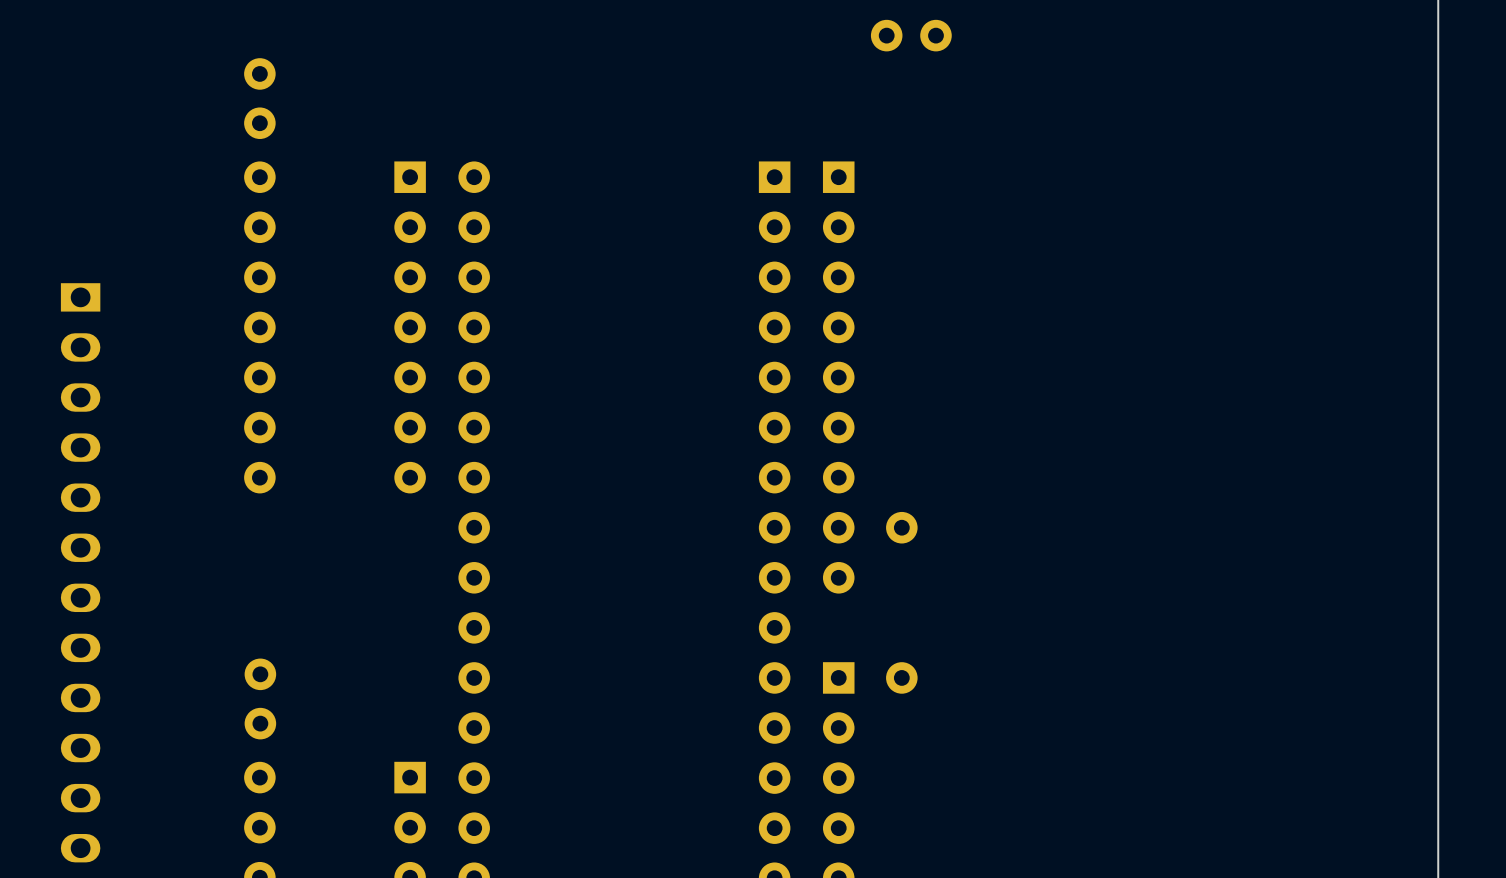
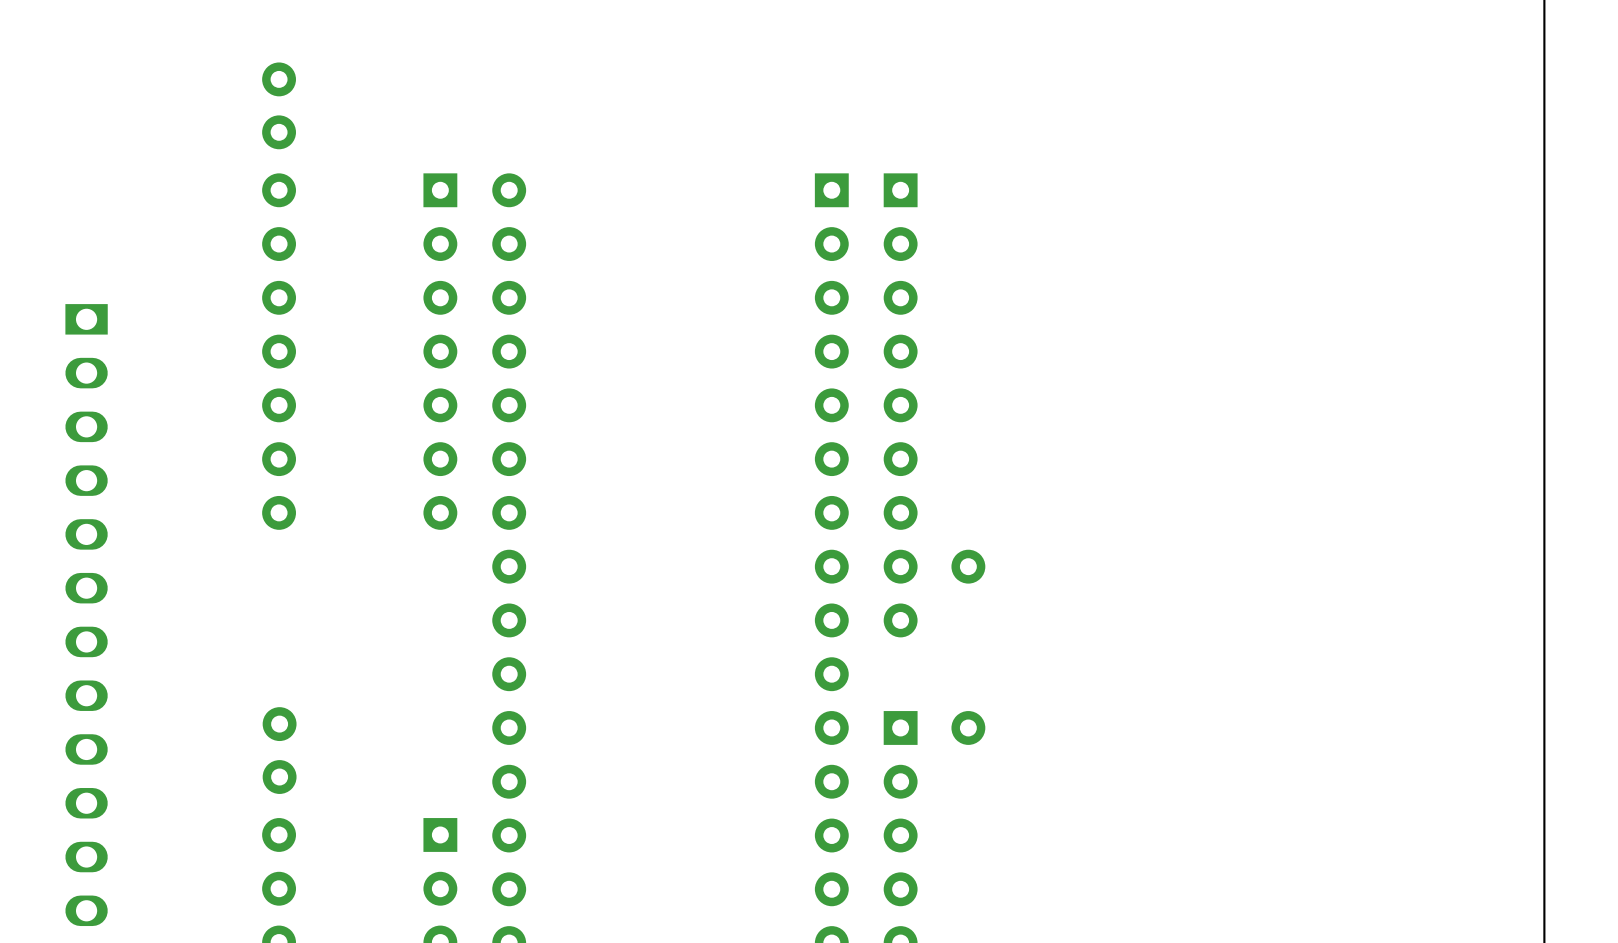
part: (911, 35) -> none

